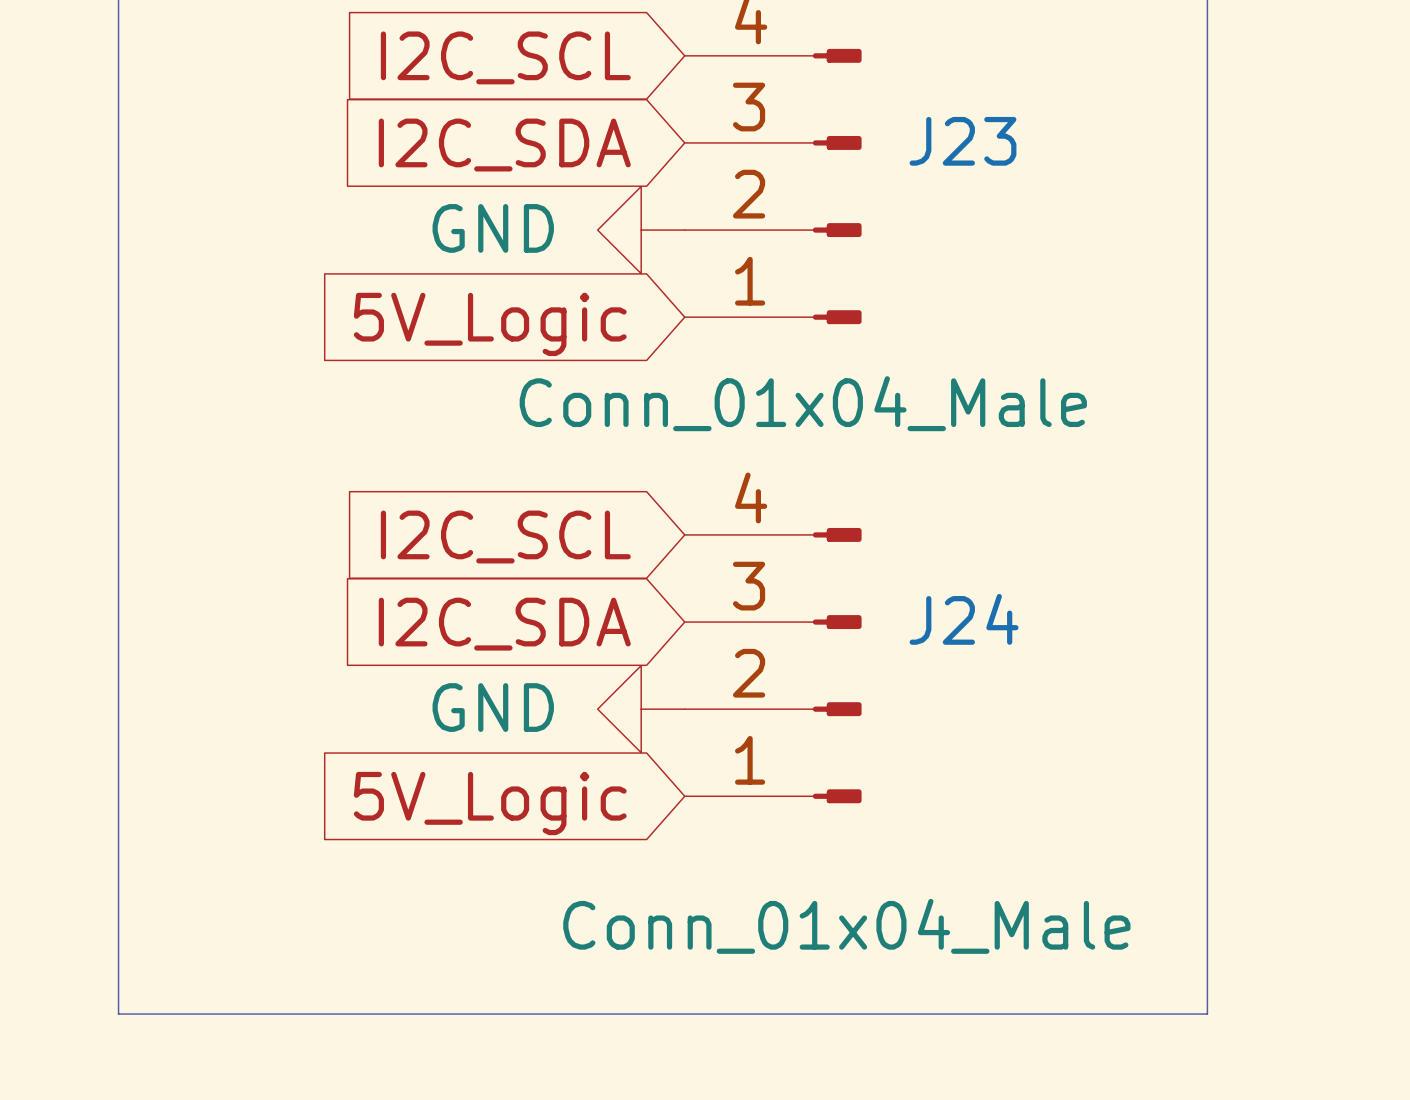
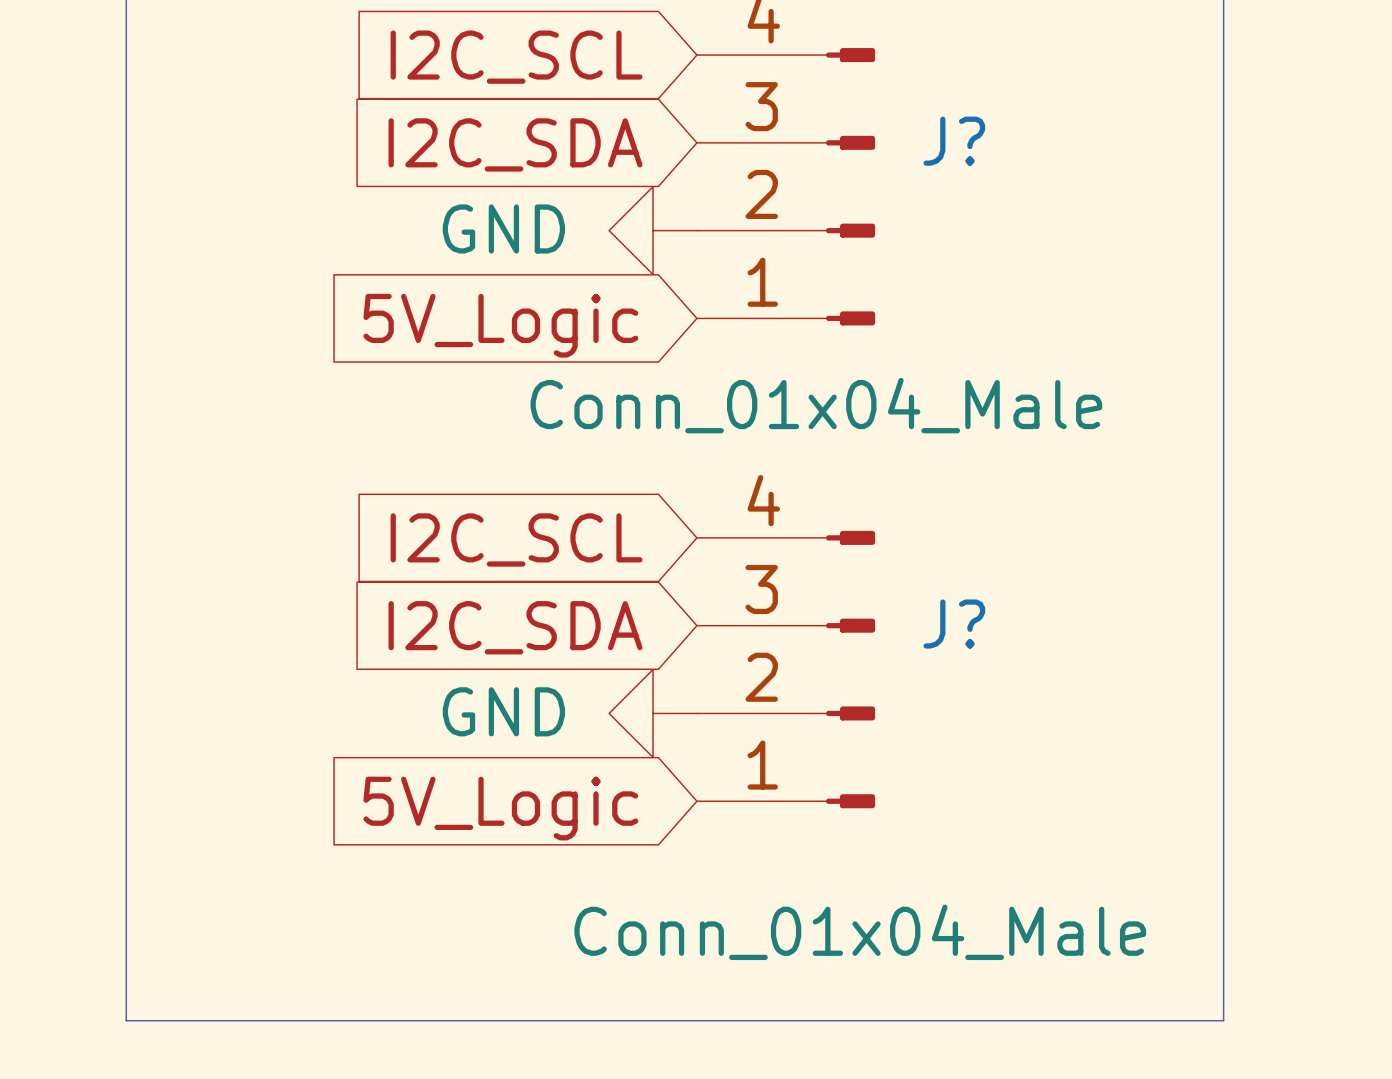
J23 name: J23 (963, 141) -> J? (954, 141)
J24 name: J24 (964, 619) -> J? (954, 624)

